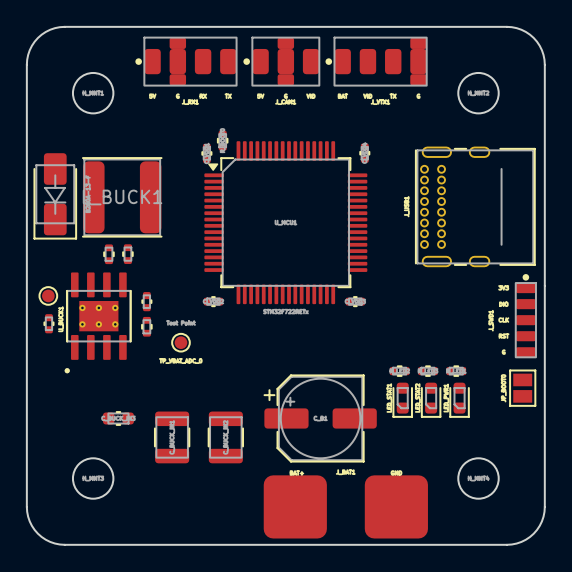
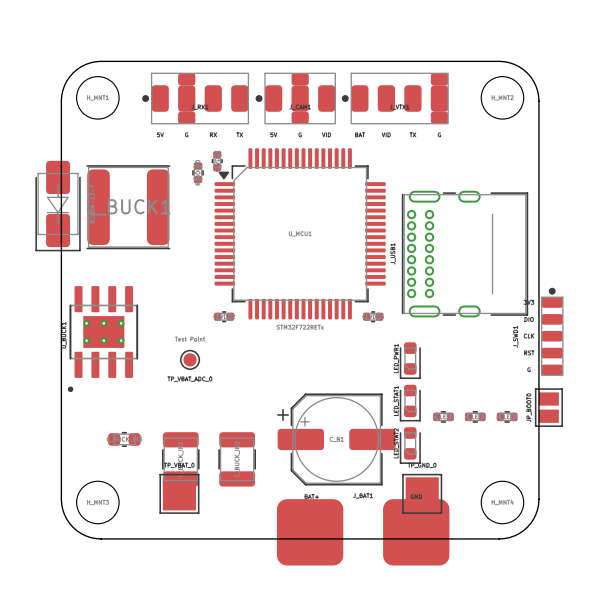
board edge: (64, 26) (506, 26) (521, 29) (533, 37) (541, 50) (544, 64) (544, 506) (541, 521) (533, 533) (521, 541) (506, 544) (64, 544) (50, 541) (37, 533) (29, 521) (26, 506) (26, 64) (29, 50) (37, 37) (50, 29) (64, 26) -> (101, 61) (85, 64) (73, 73) (64, 85) (61, 101) (61, 499) (64, 514) (73, 527) (85, 535) (101, 538) (499, 538) (514, 535) (527, 527) (535, 514) (538, 499) (538, 101) (535, 85) (527, 73) (514, 64) (499, 61) (101, 61)
part position: (186, 61) -> (195, 98)
part position: (281, 61) -> (295, 98)
part position: (376, 61) -> (395, 98)
part position: (222, 140) -> (198, 172)
part: (364, 153) -> none
part position: (475, 206) -> (465, 254)
part: (108, 254) -> none
part: (127, 254) -> none
part: (48, 295) -> none
part: (146, 301) -> none
part: (48, 323) -> none
part: (146, 326) -> none
part position: (399, 371) -> (475, 416)
part position: (427, 371) -> (507, 416)
part position: (456, 371) -> (443, 416)
part position: (402, 400) -> (410, 403)
part position: (431, 400) -> (410, 445)
part position: (459, 400) -> (410, 360)
part: none -> (179, 493)
part: none -> (422, 493)

